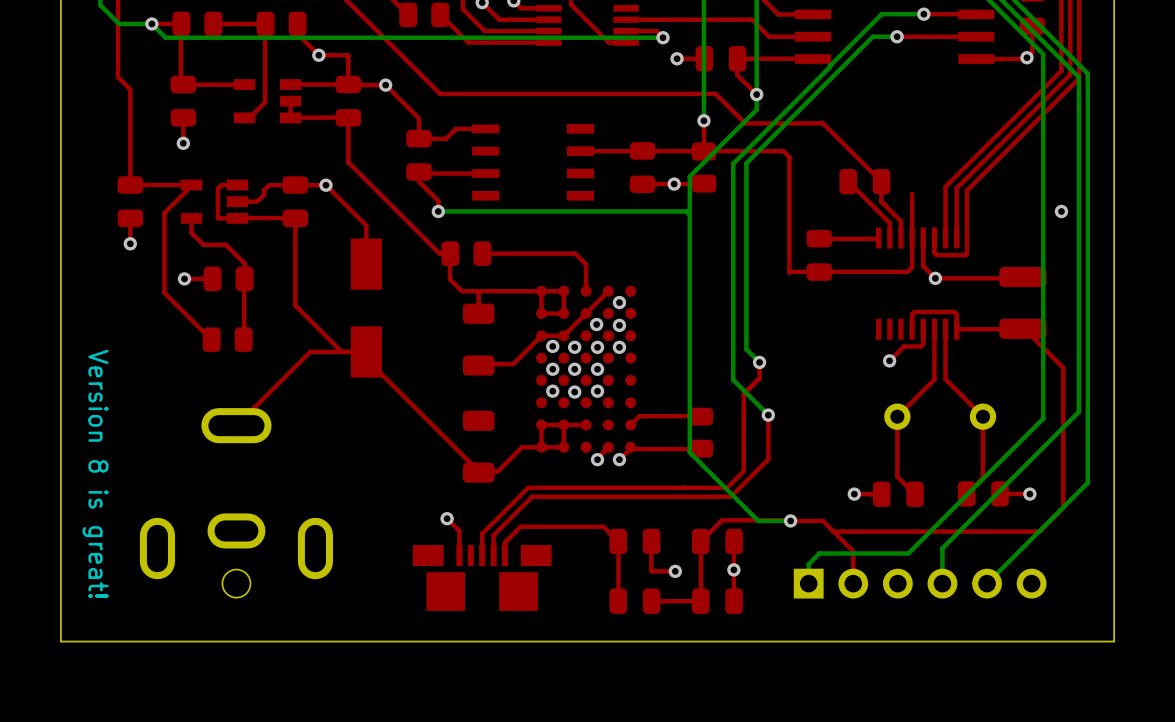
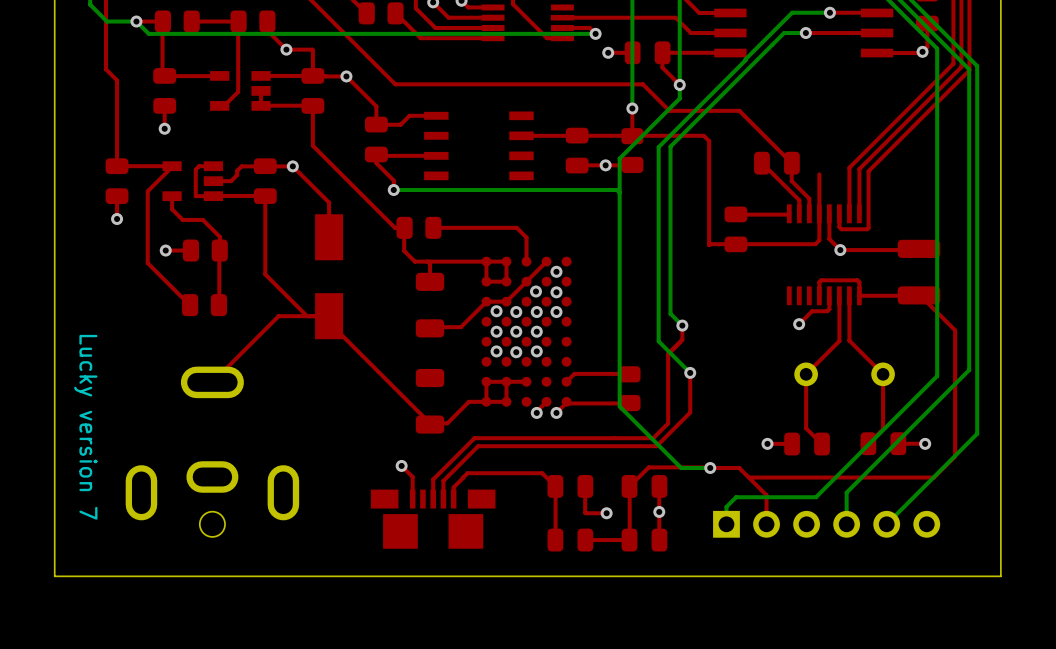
via: (1061, 211) -> none
text: Version 8 is great! (95, 473) -> Lucky version 7 (85, 427)

